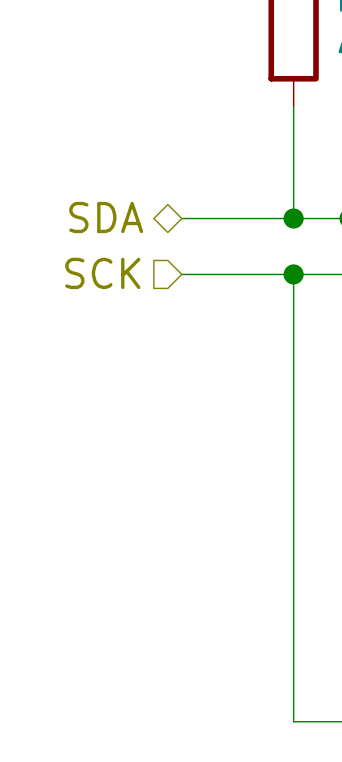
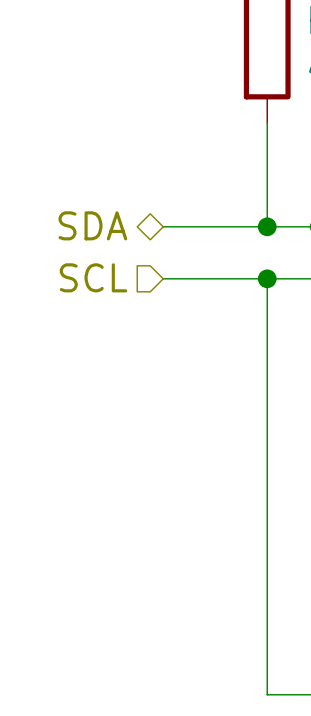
hierarchical label: SCK (102, 273) -> SCL (93, 277)

